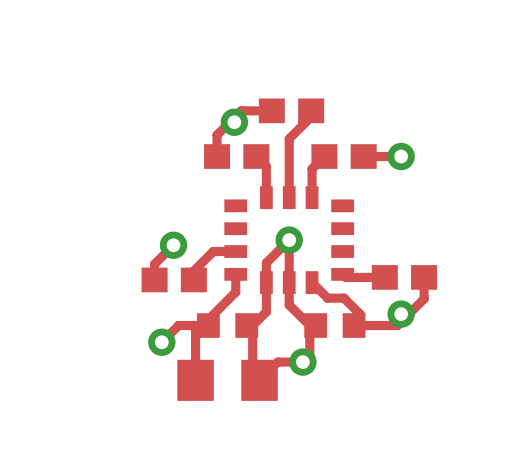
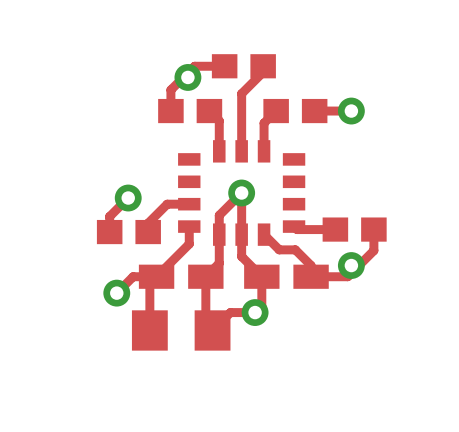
part footprint: [196, 313, 259, 338] -> [138, 264, 224, 289]
part footprint: [304, 313, 366, 338] -> [244, 264, 329, 289]

